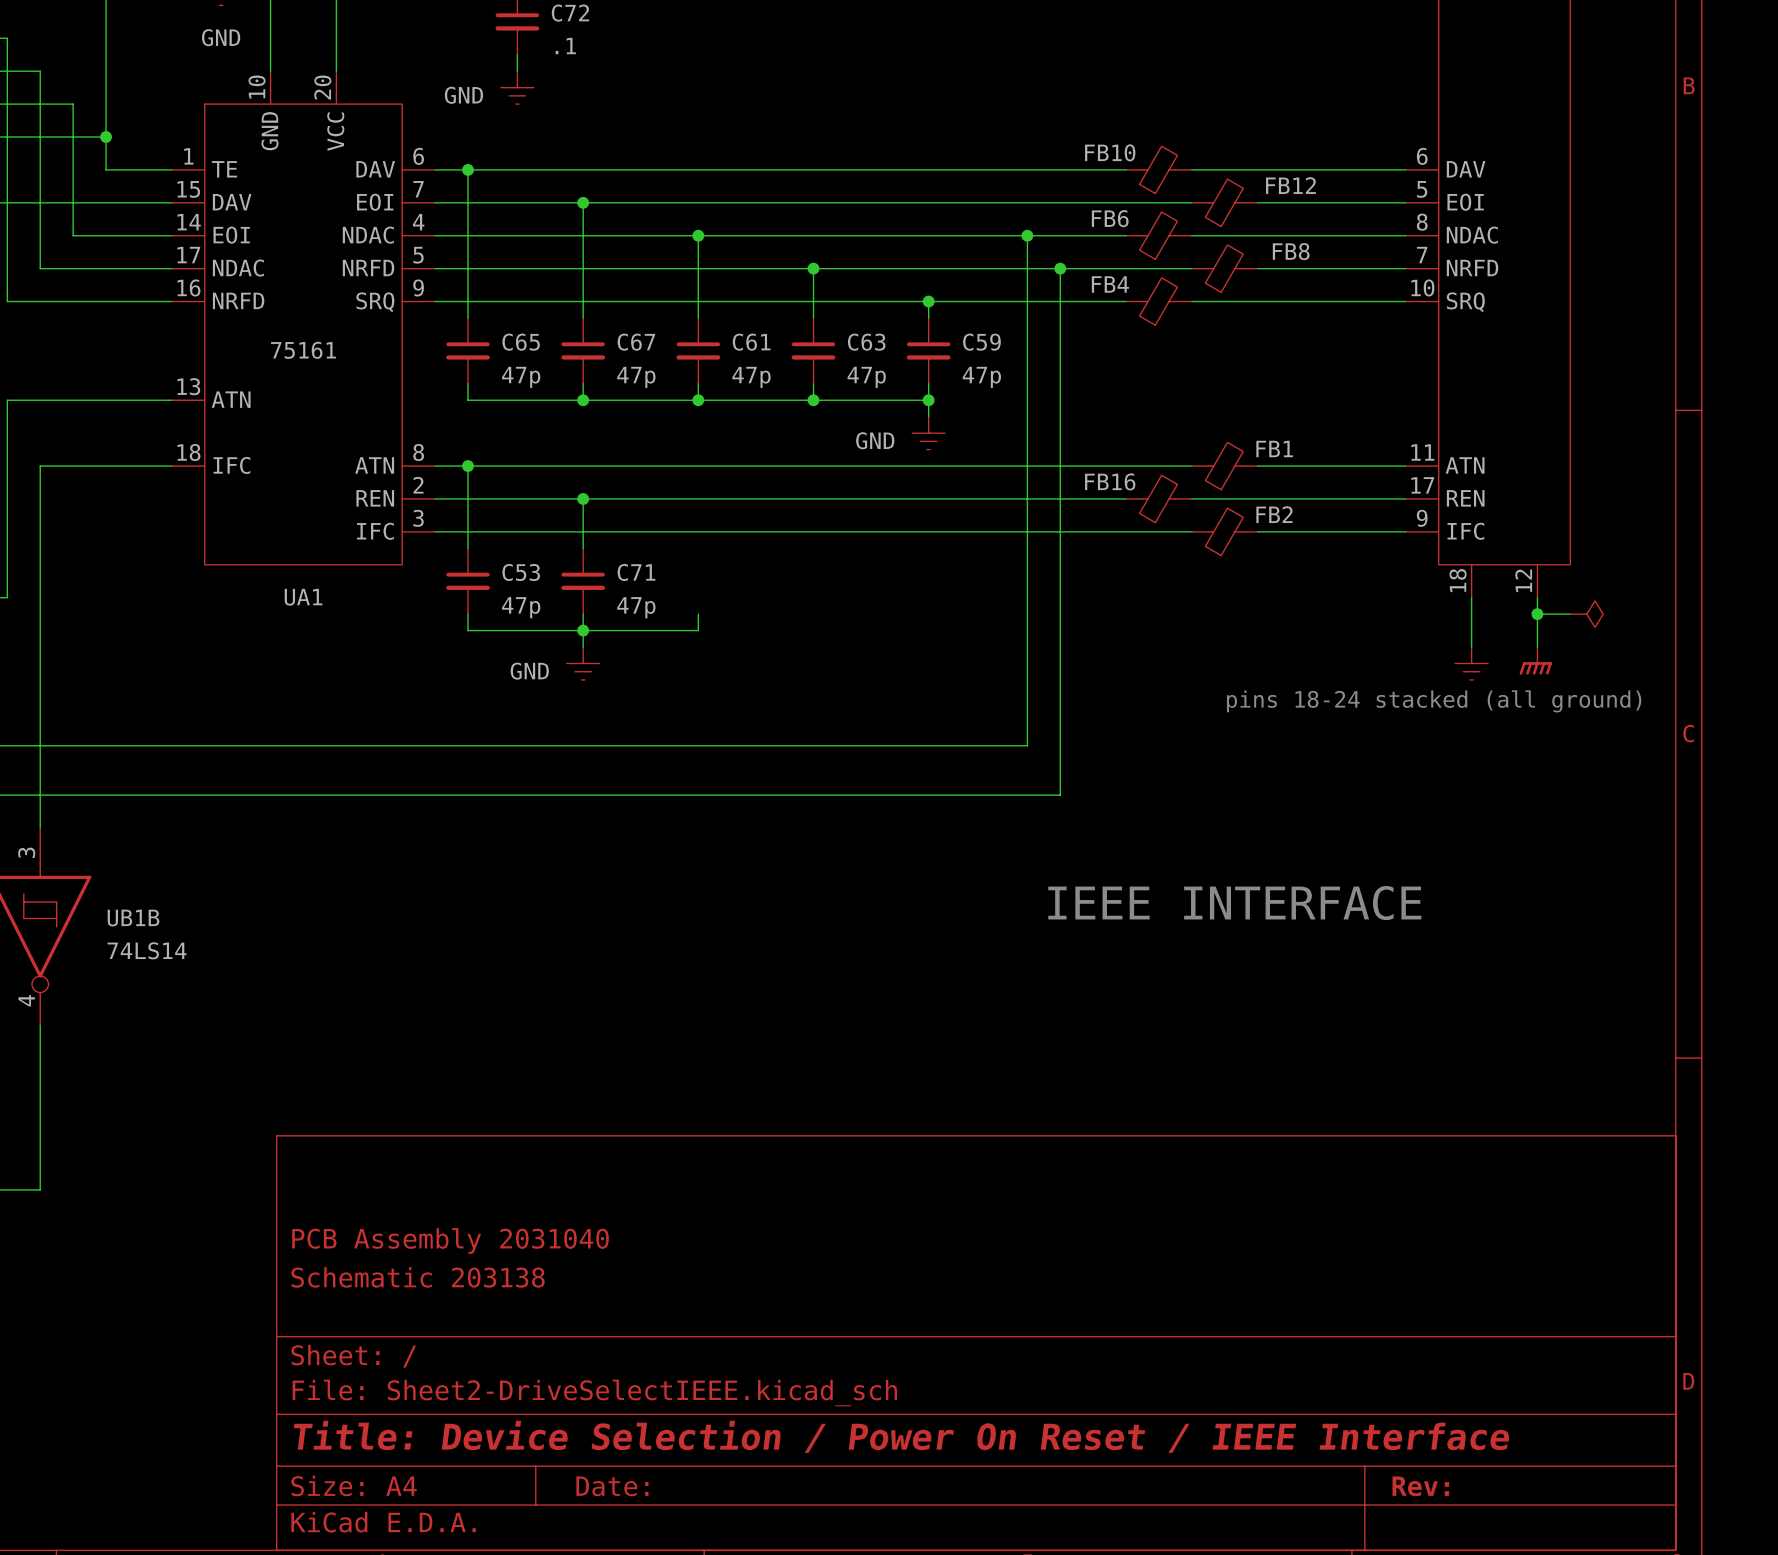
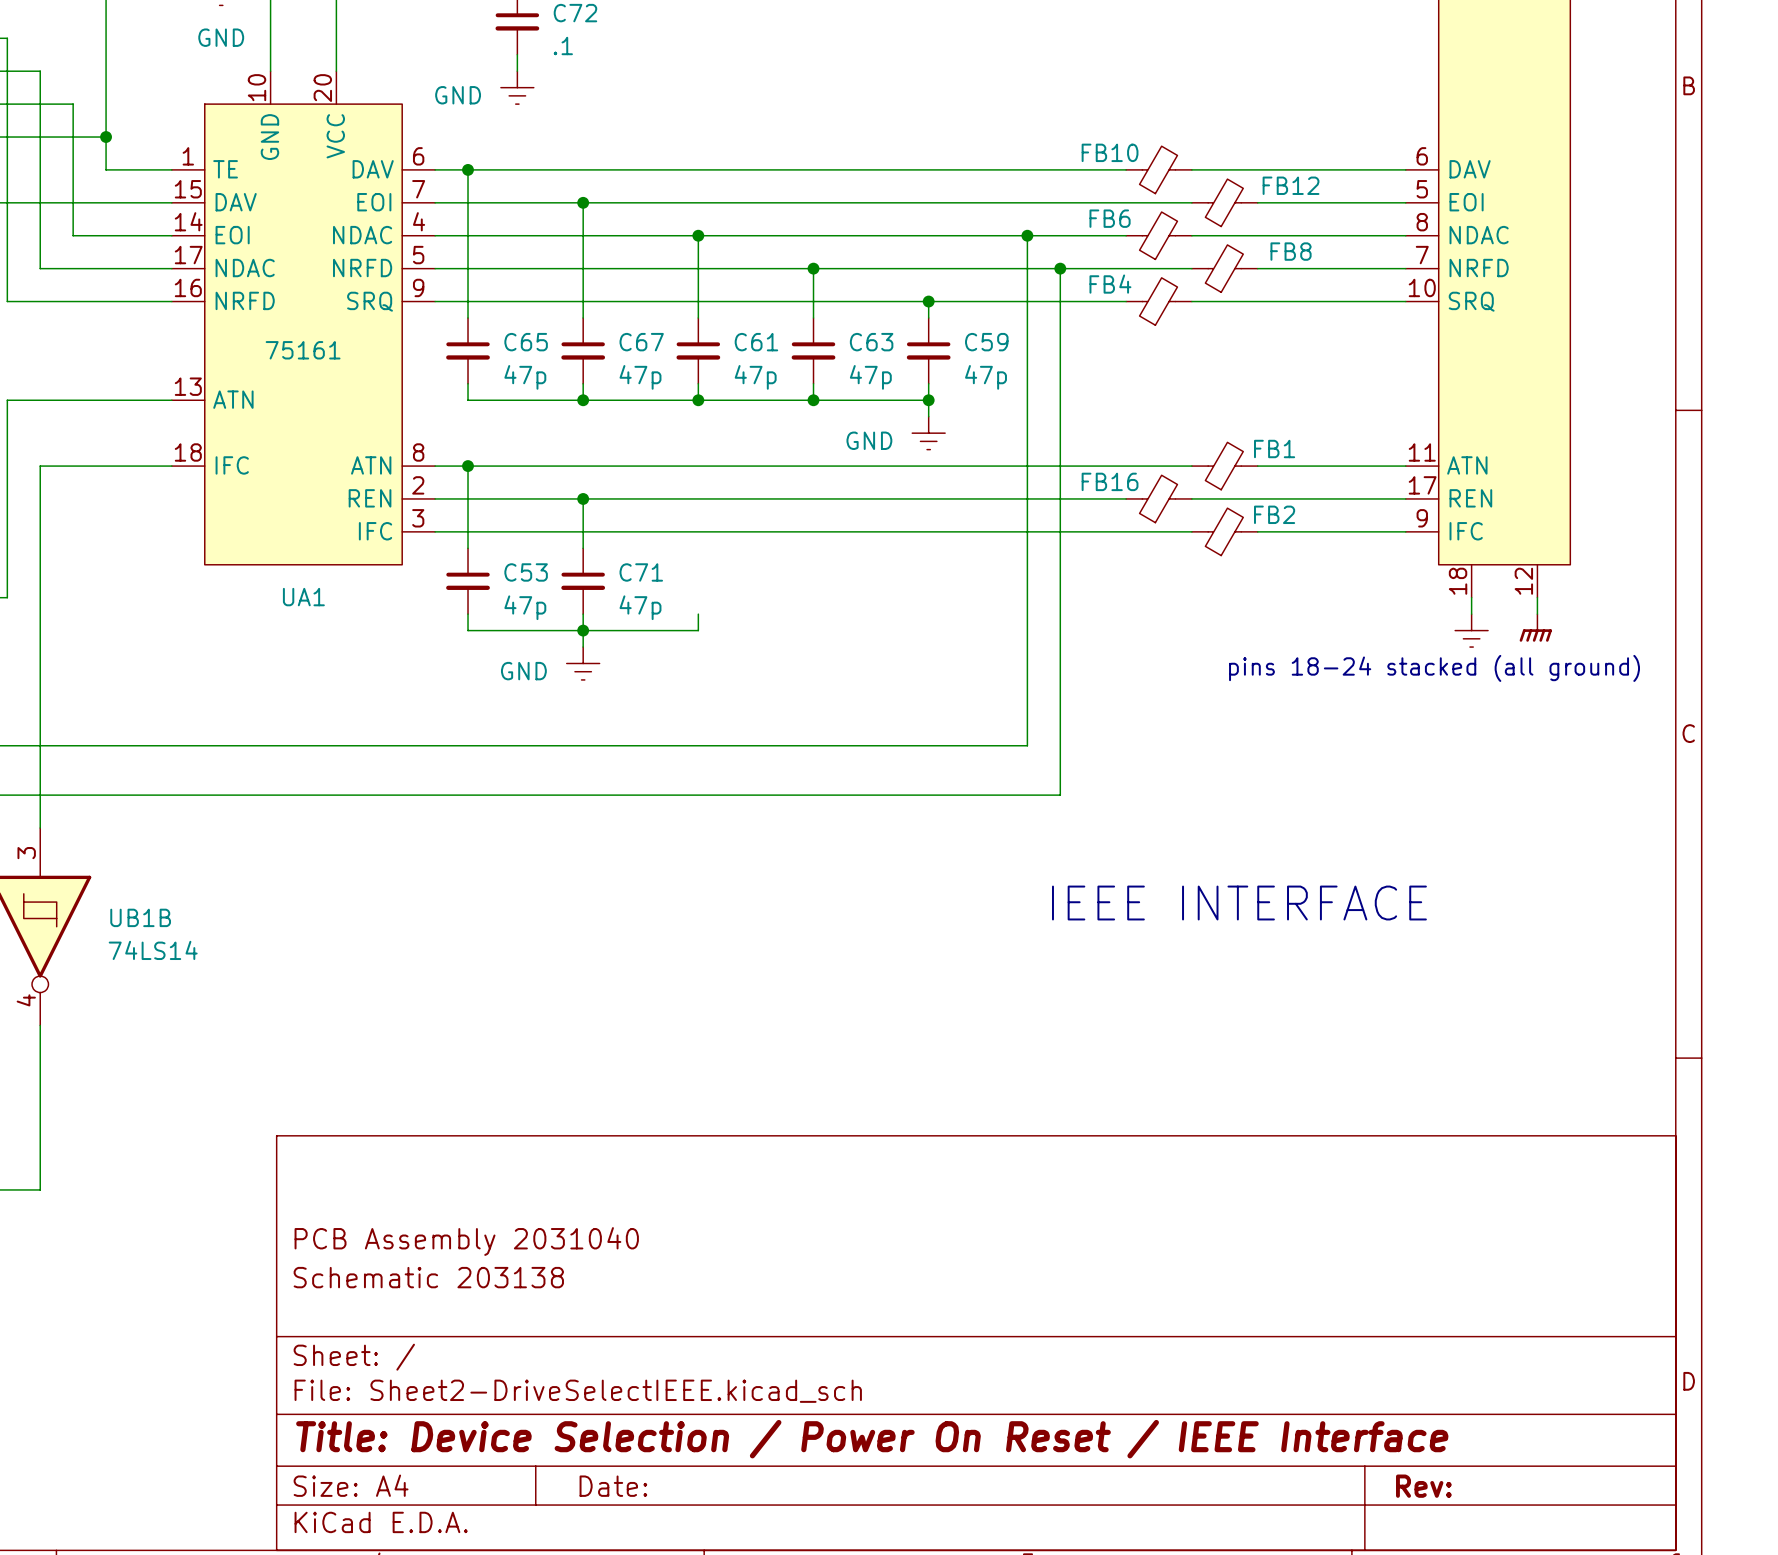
junction: (1537, 614) -> none
wire: (1570, 614) (1537, 614) (1537, 647) -> none
power symbol: (1586, 614) -> none
power symbol position: (1535, 660) -> (1535, 627)
power symbol position: (1471, 663) -> (1471, 630)
text position: pins 18-24 stacked (all ground) (1434, 701) -> pins 18-24 stacked (all ground) (1434, 668)

